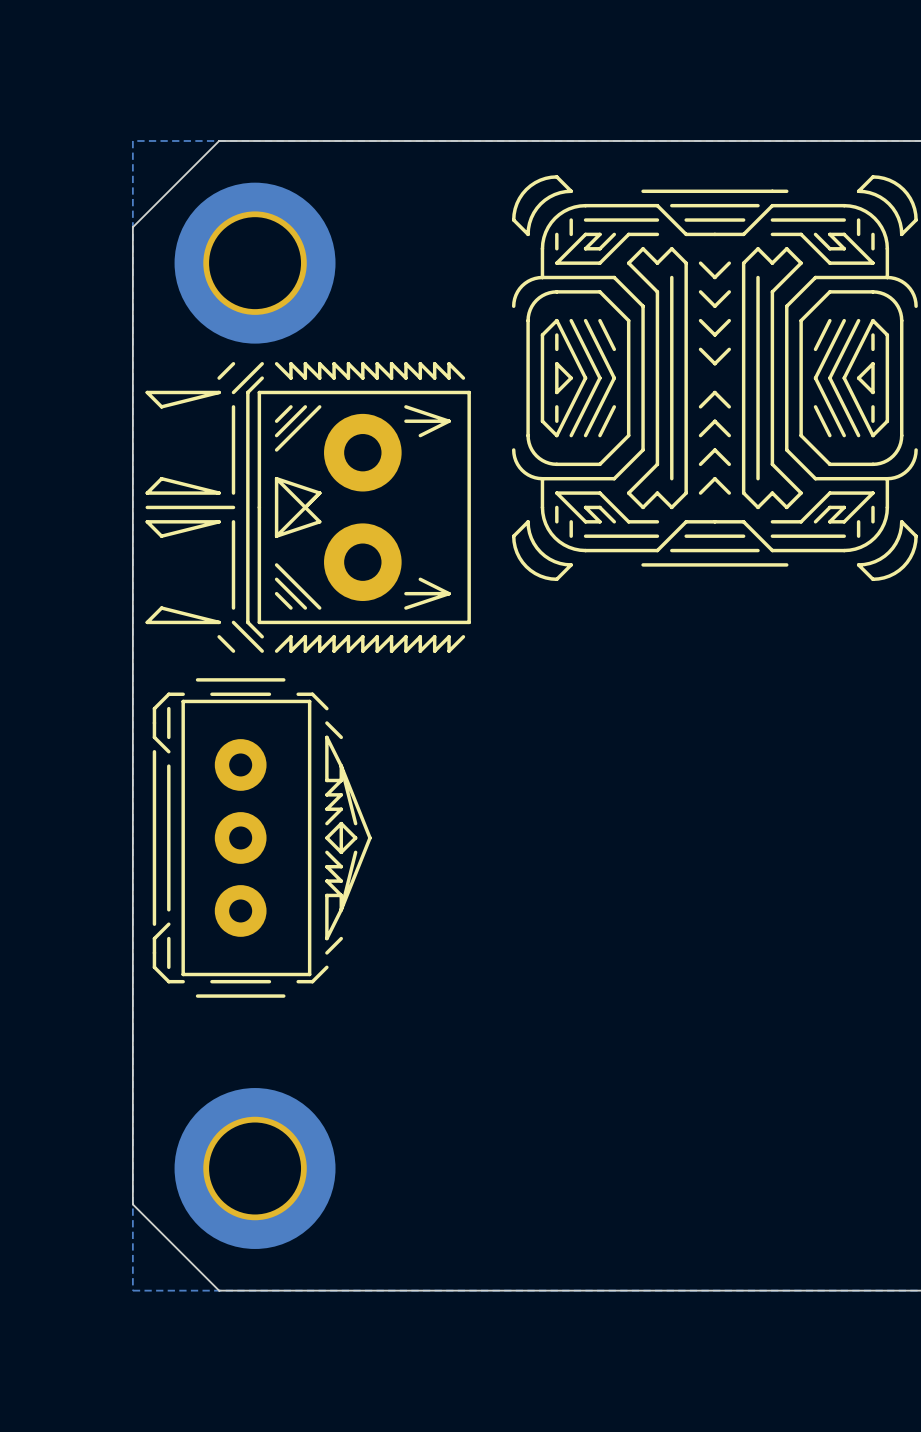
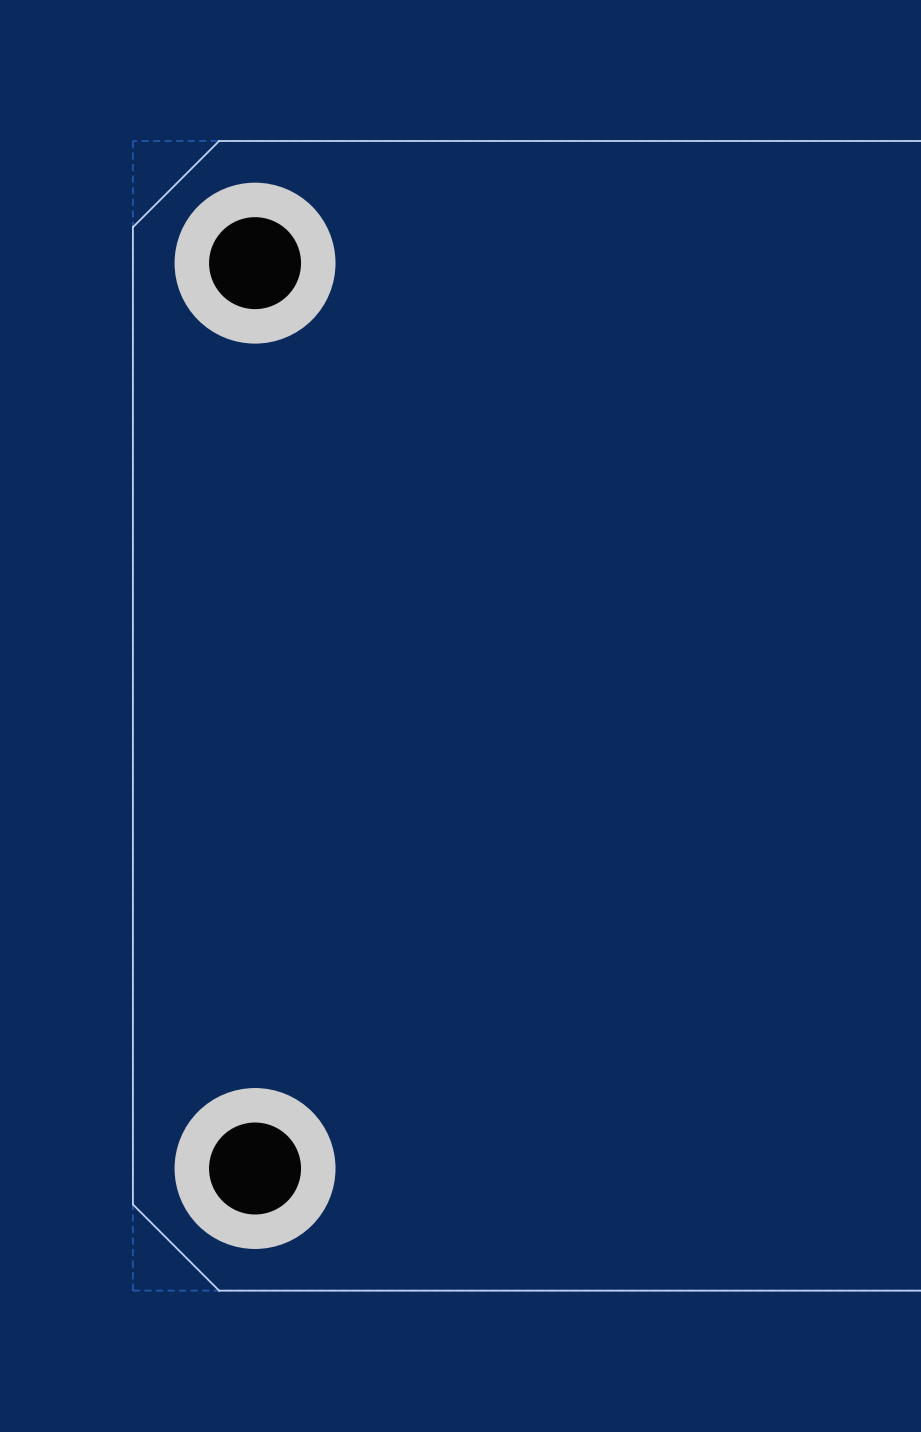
part: (714, 378) -> none
part: (308, 507) -> none
part: (262, 837) -> none

